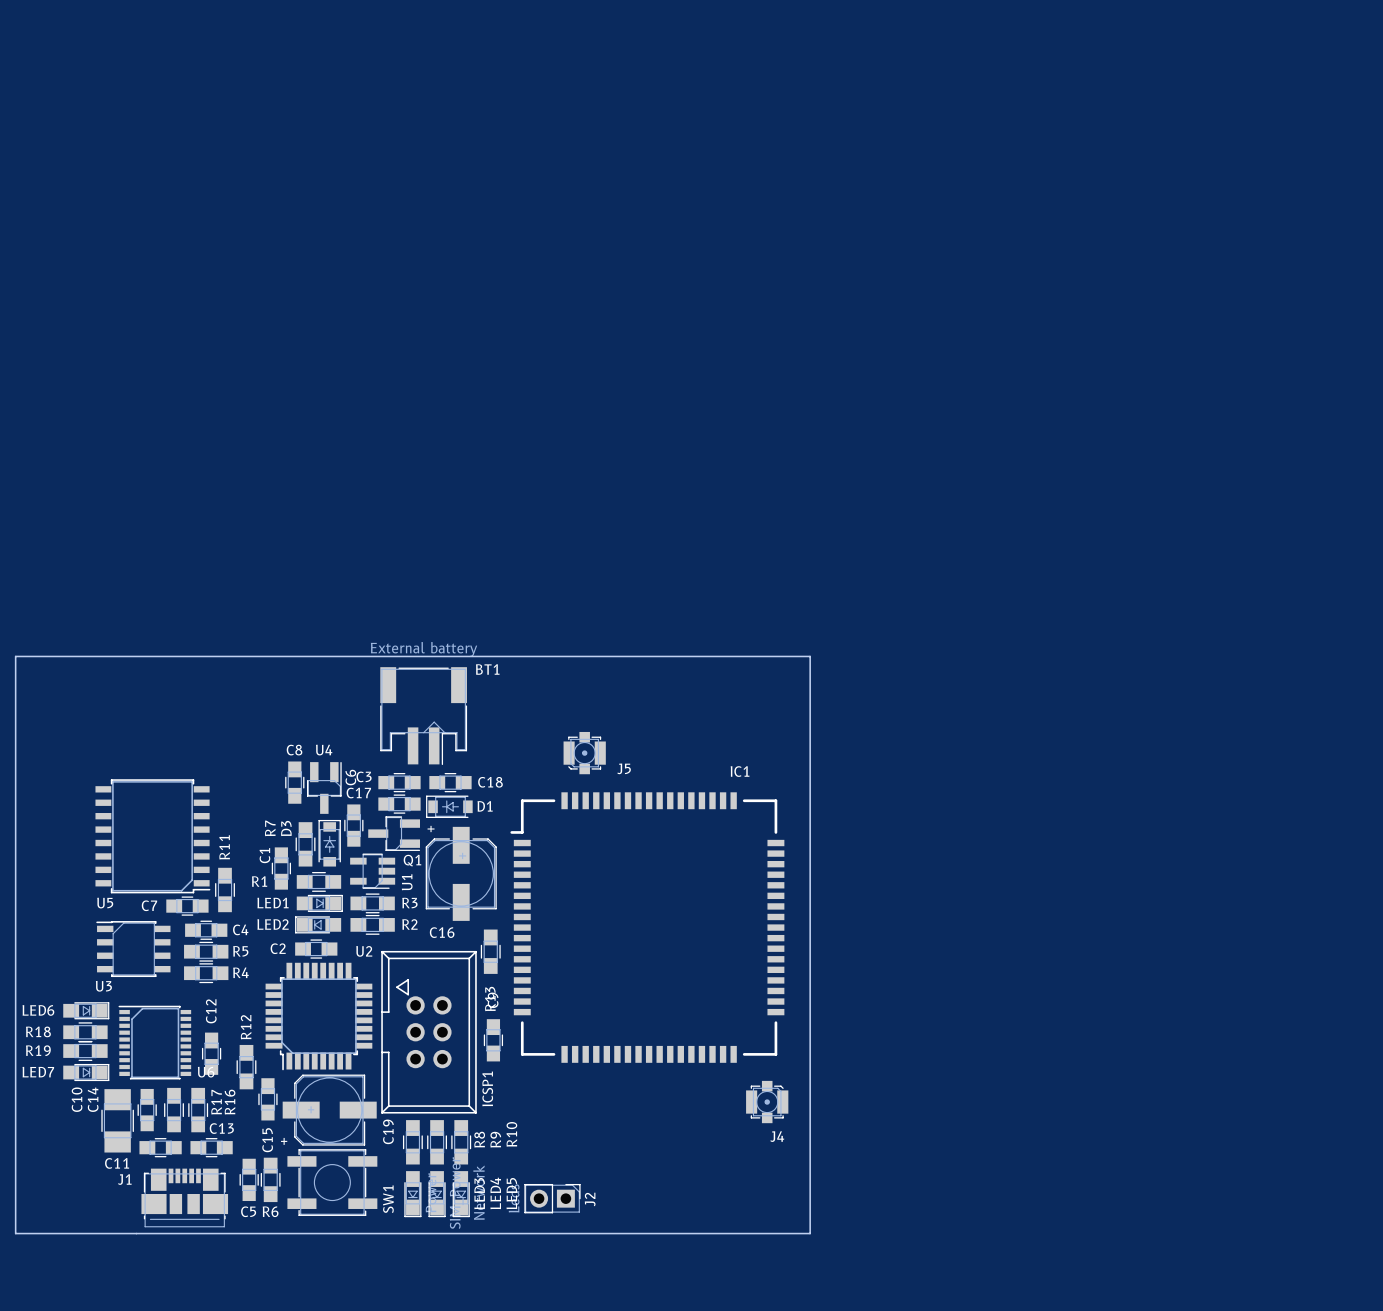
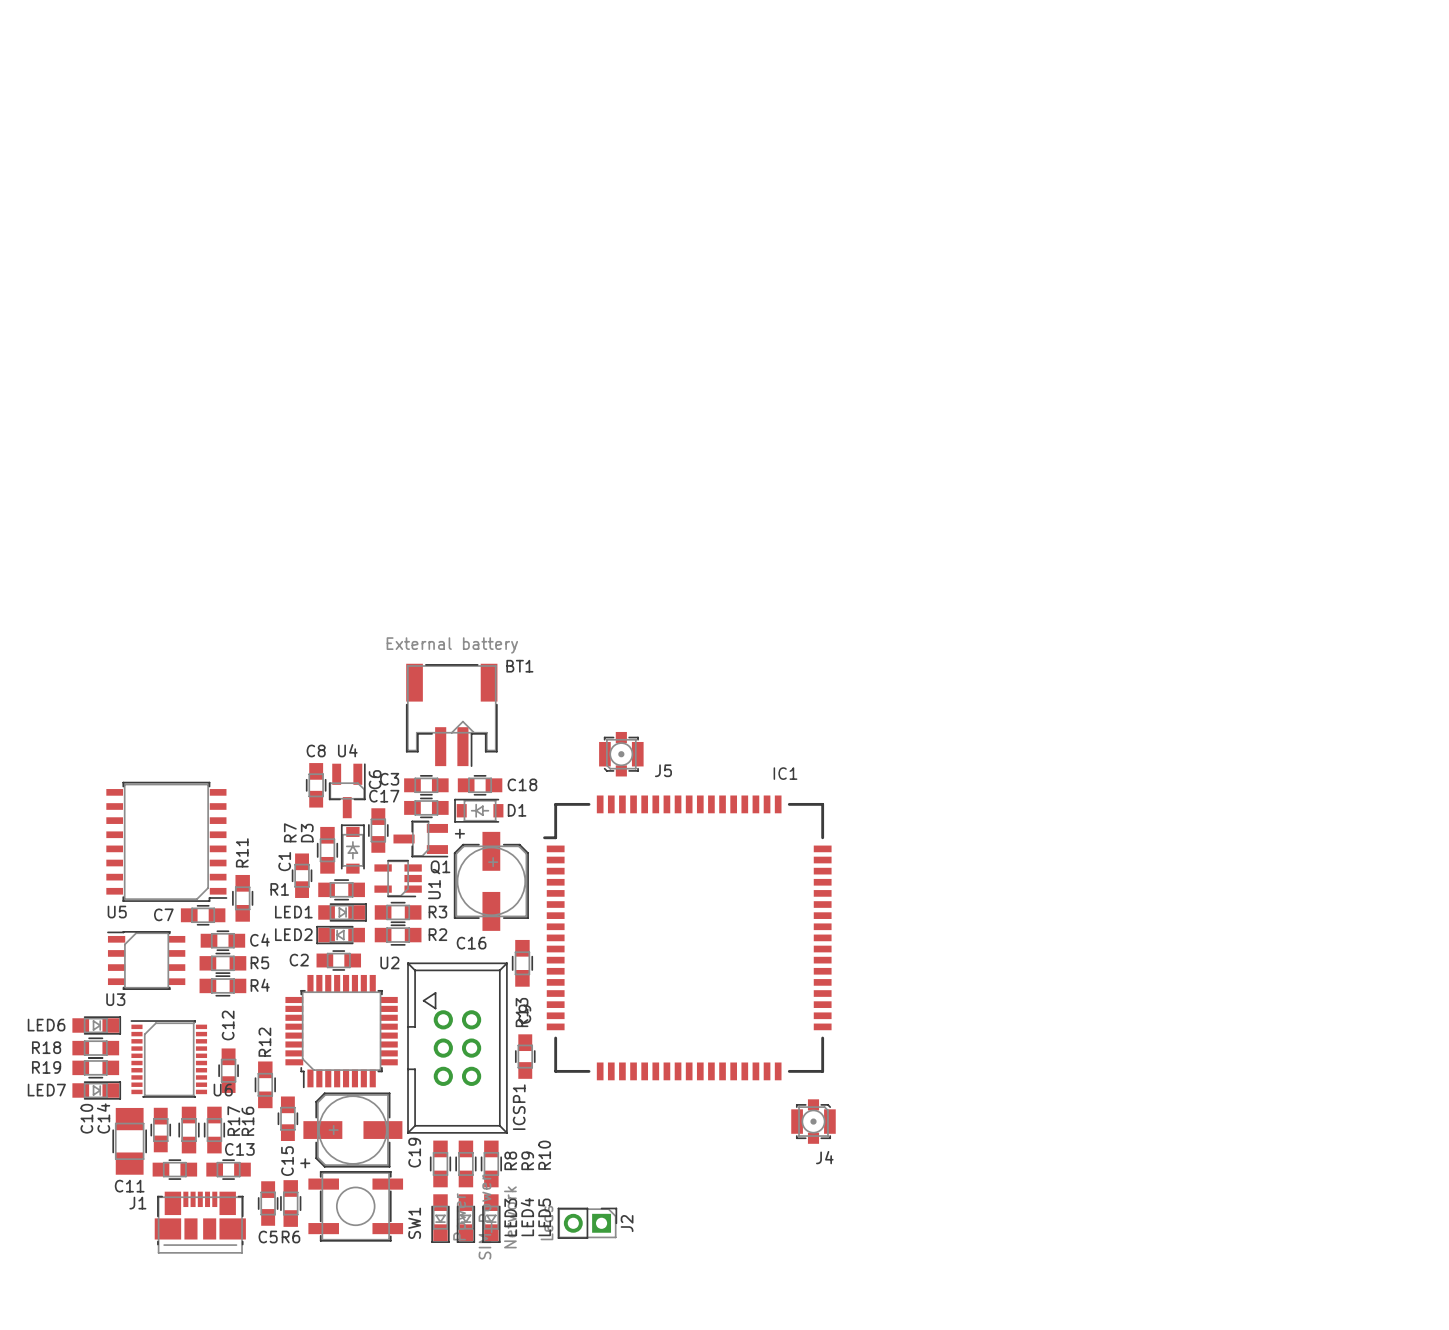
board edge: (15, 656) (15, 1233) (810, 1233) (810, 656) (15, 656) -> none

